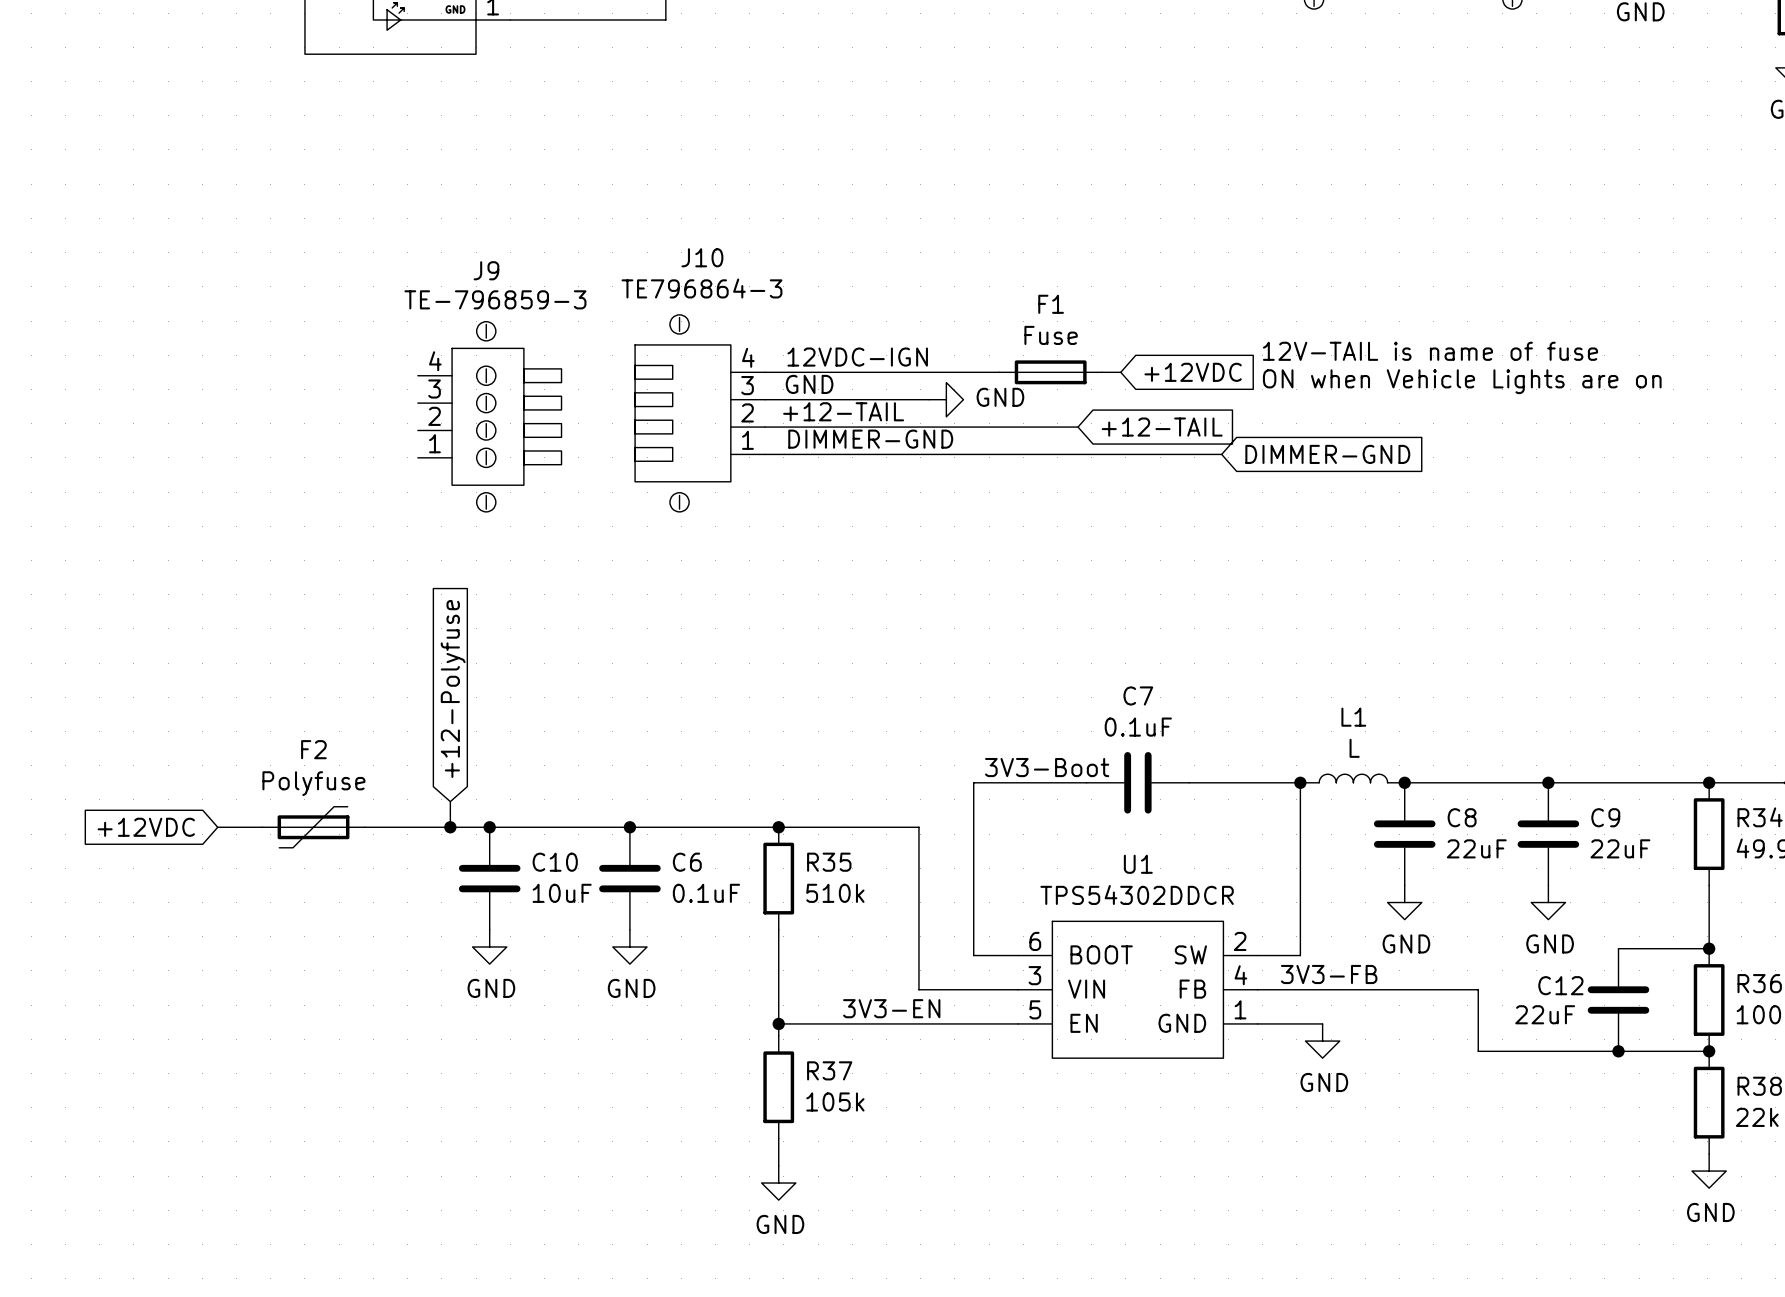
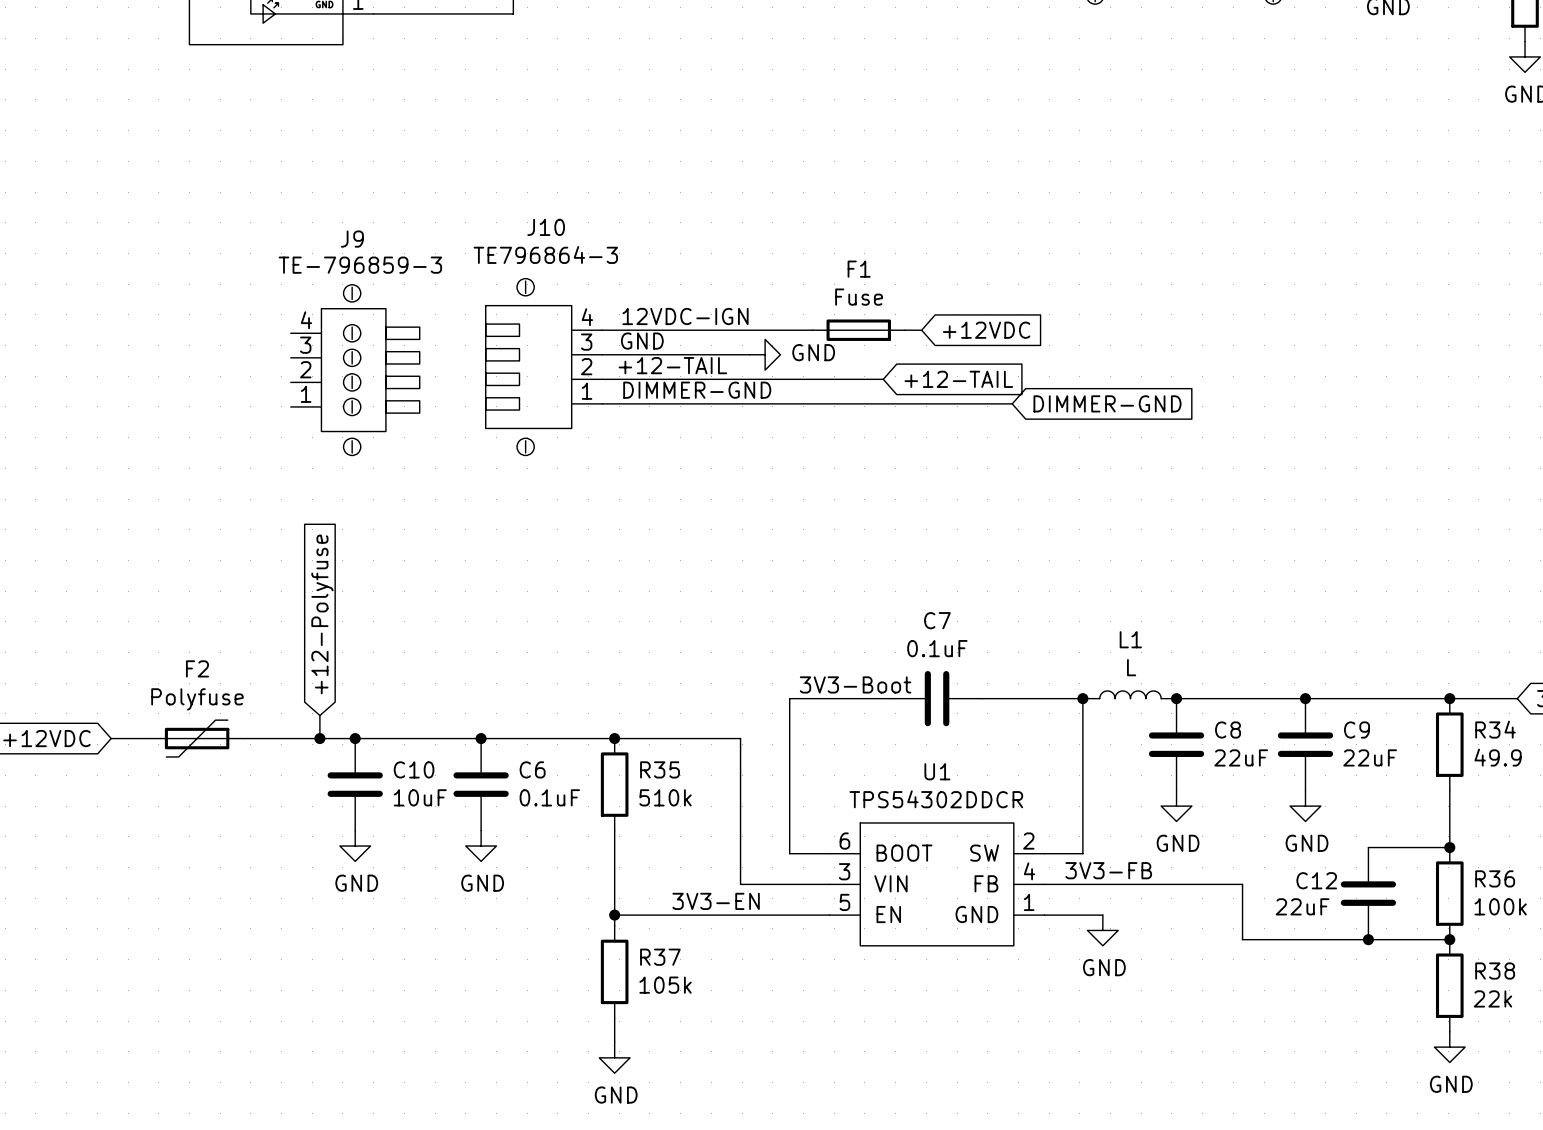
text: 12V-TAIL is name of fuse (1430, 351) -> none
text: ON when Vehicle Lights are on (1462, 381) -> none

